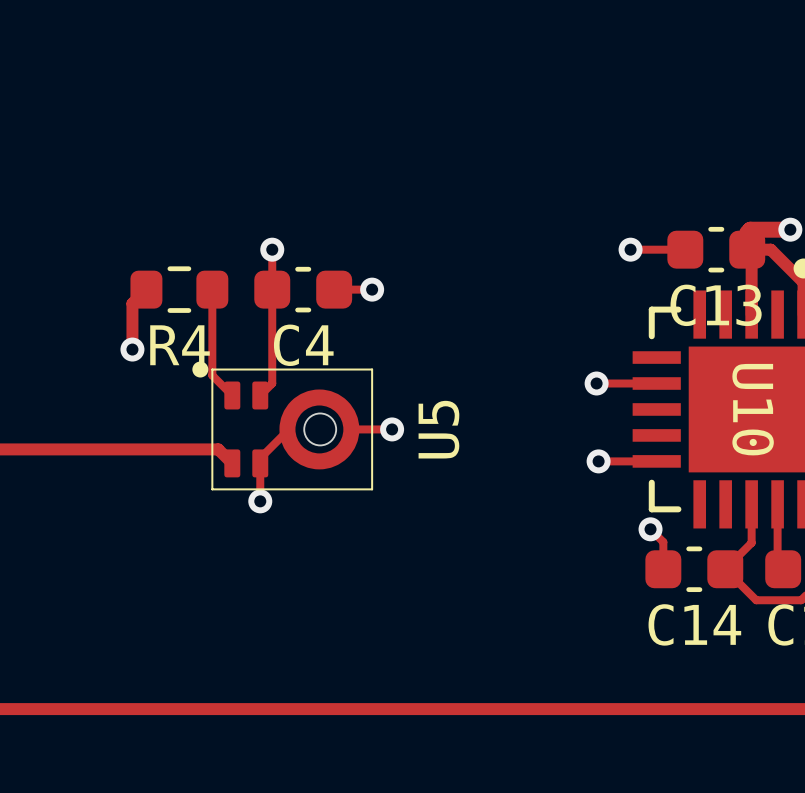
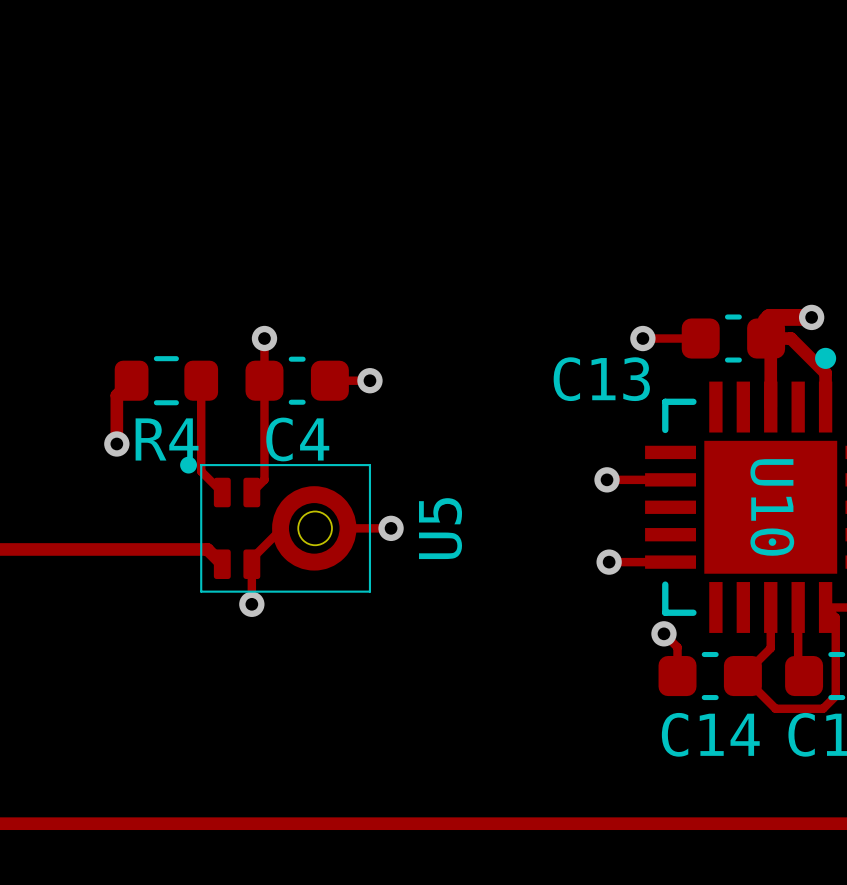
C13 name position: C13 (716, 305) -> C13 (601, 379)

